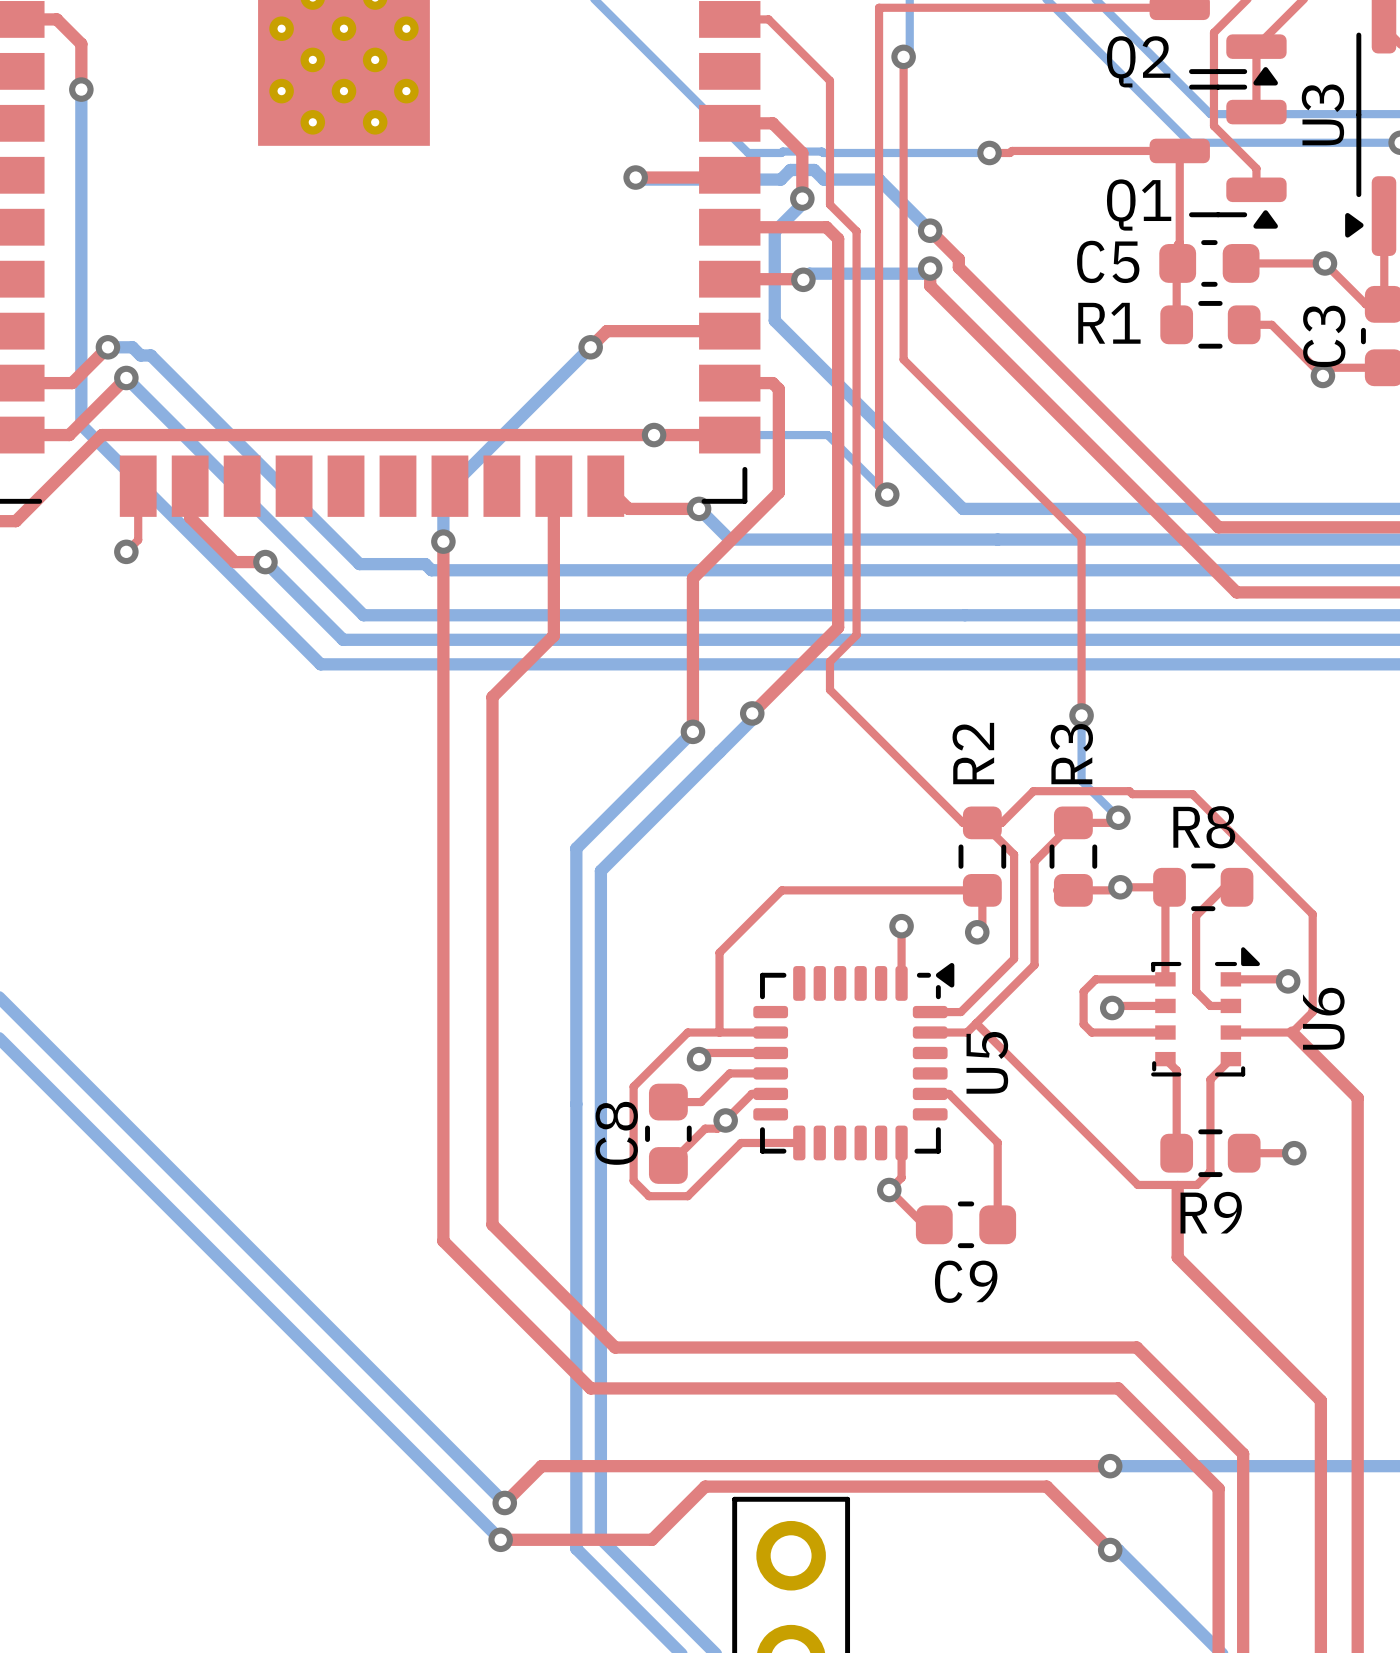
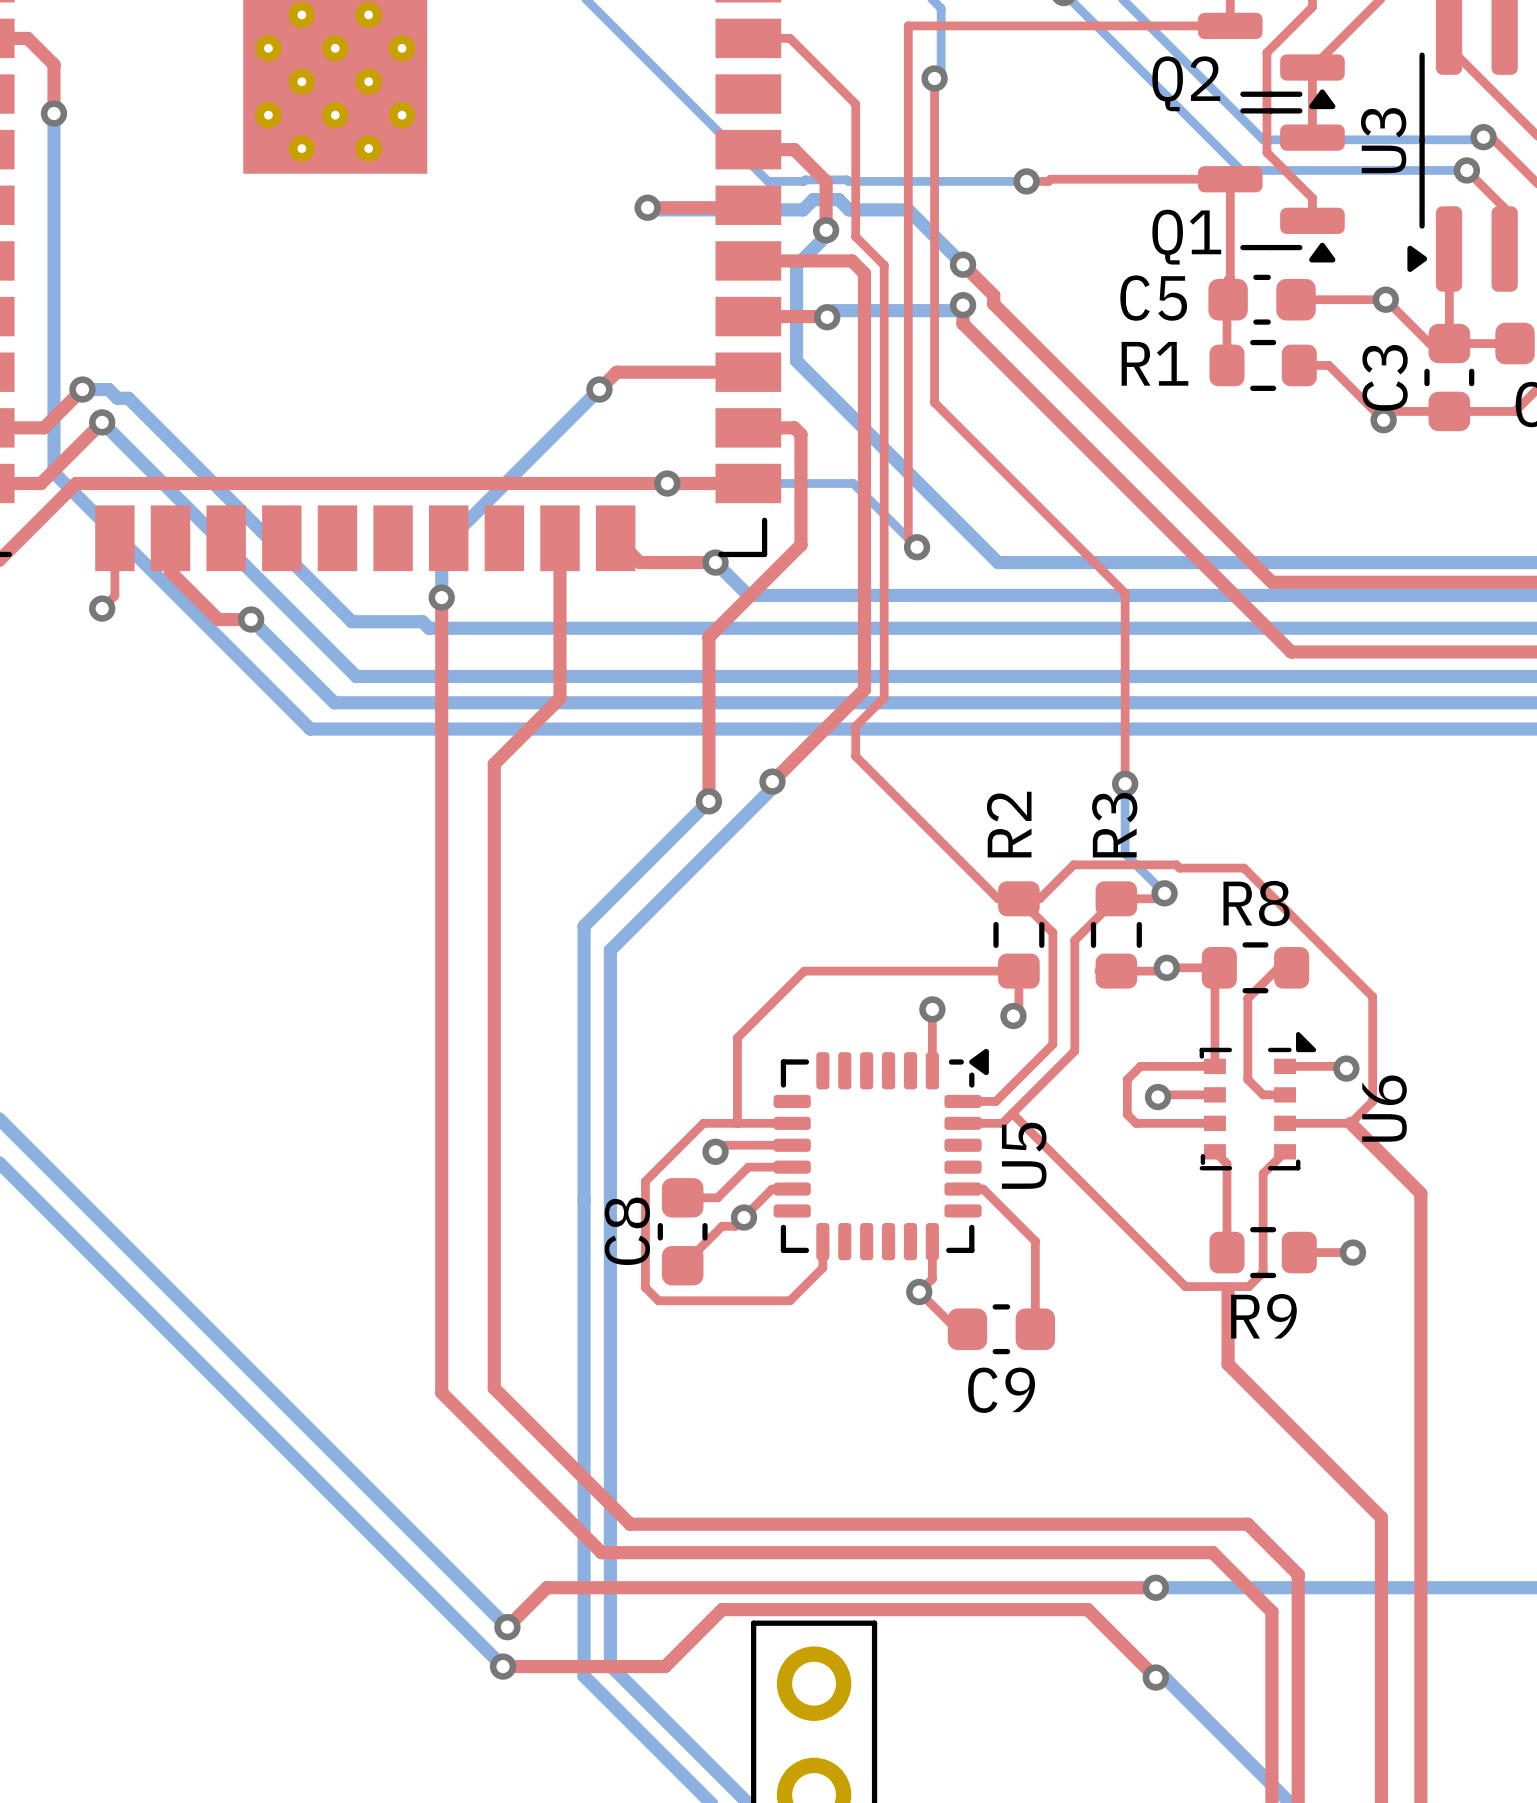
top track: (799, 1142) (741, 1142) (687, 1196) (648, 1196) (633, 1180) -> (822, 1241) (822, 1267) (790, 1300) (658, 1300) (645, 1287) (645, 1282)
top track: (492, 1224) (615, 1347) (1136, 1347) (1196, 1406) -> (494, 1329) (494, 1388) (630, 1524) (1247, 1524)
top track: (443, 1241) (590, 1388) (1118, 1388) (1163, 1433) -> (441, 1346) (441, 1392) (601, 1552) (1212, 1552)

